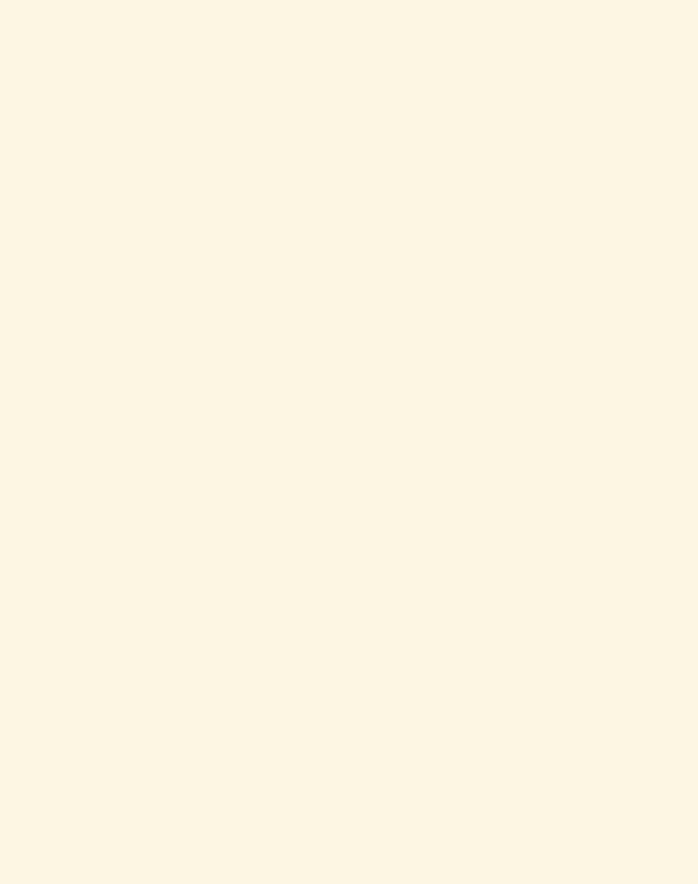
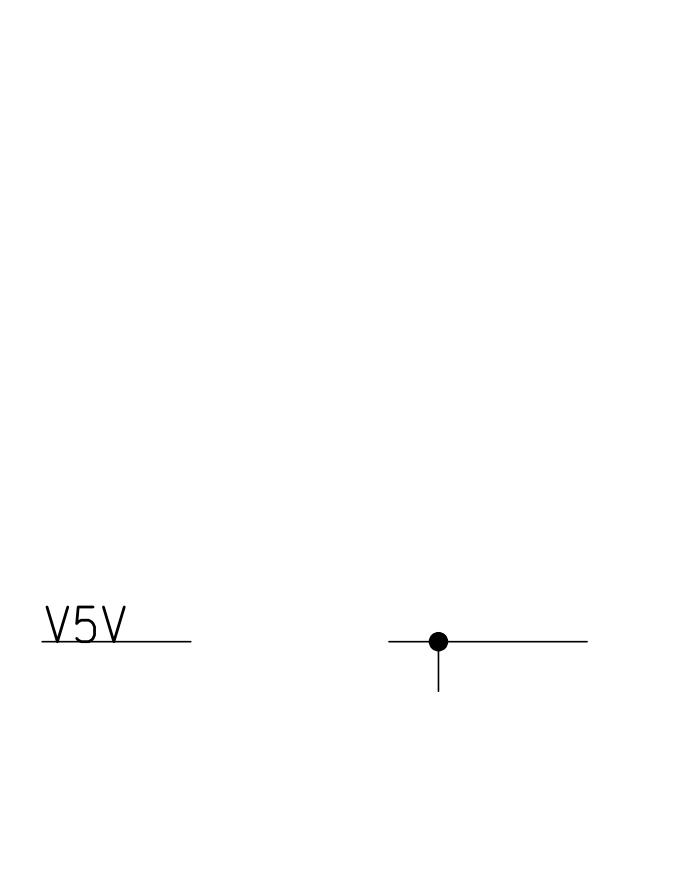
label: none -> V5V (85, 624)
wire: none -> (42, 641) (190, 641)
wire: none -> (388, 641) (587, 641)
wire: none -> (438, 641) (438, 691)
junction: none -> (438, 641)

